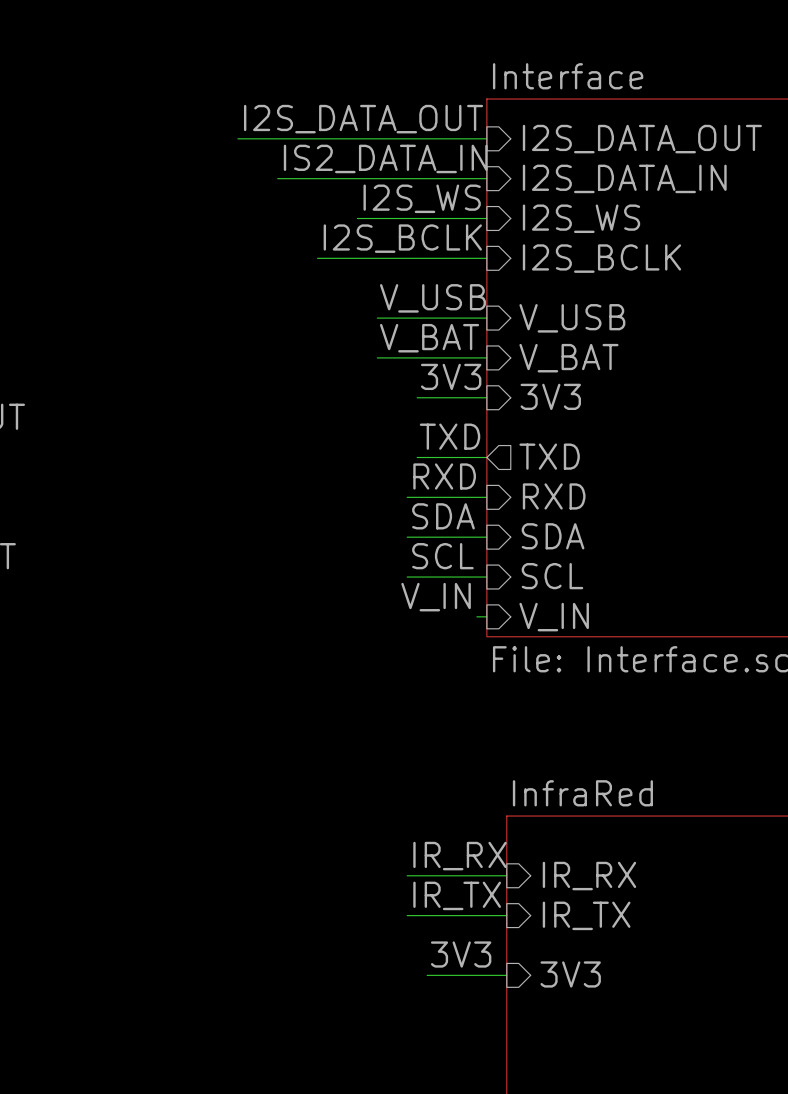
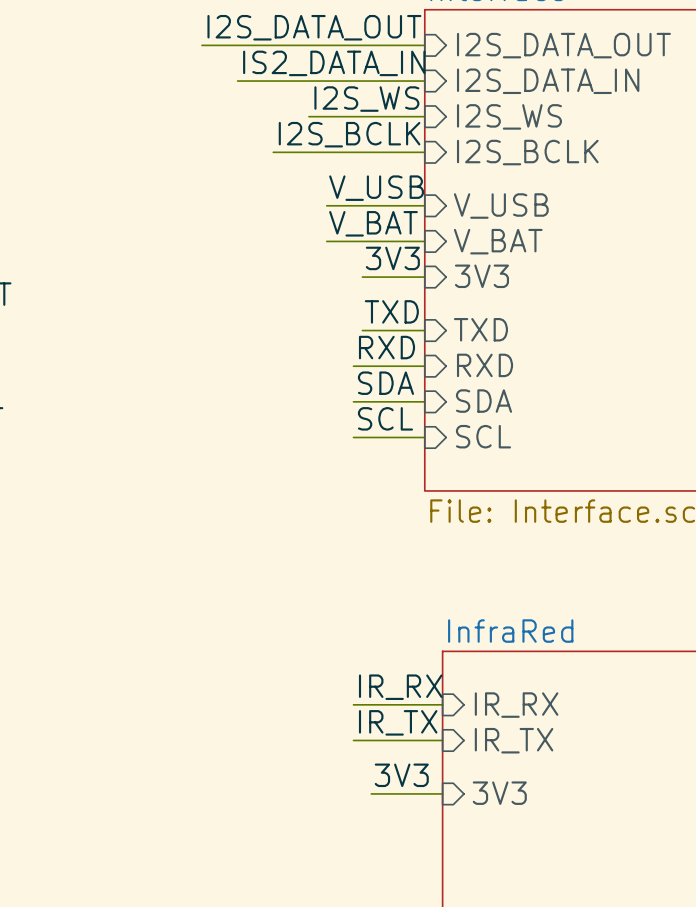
sheet pin shape: output (549, 456) -> input (480, 329)
label: V_IN (436, 597) -> none
wire: (476, 616) (486, 616) -> none
sheet pin: V_IN (554, 617) -> none

